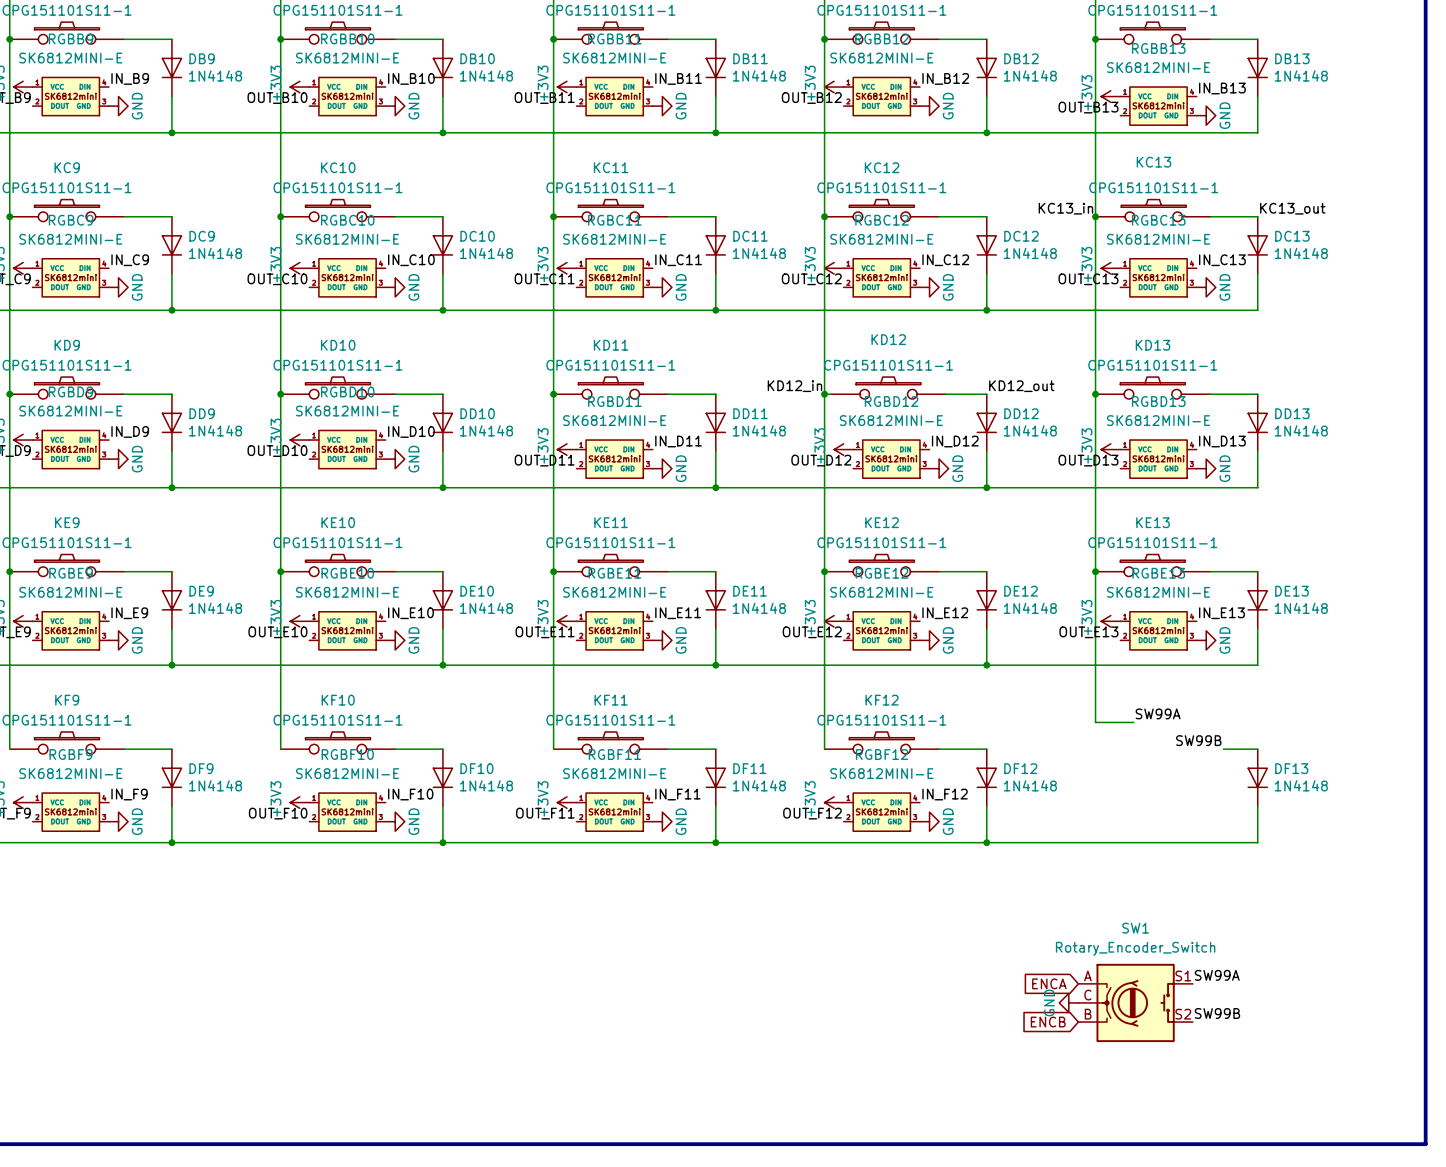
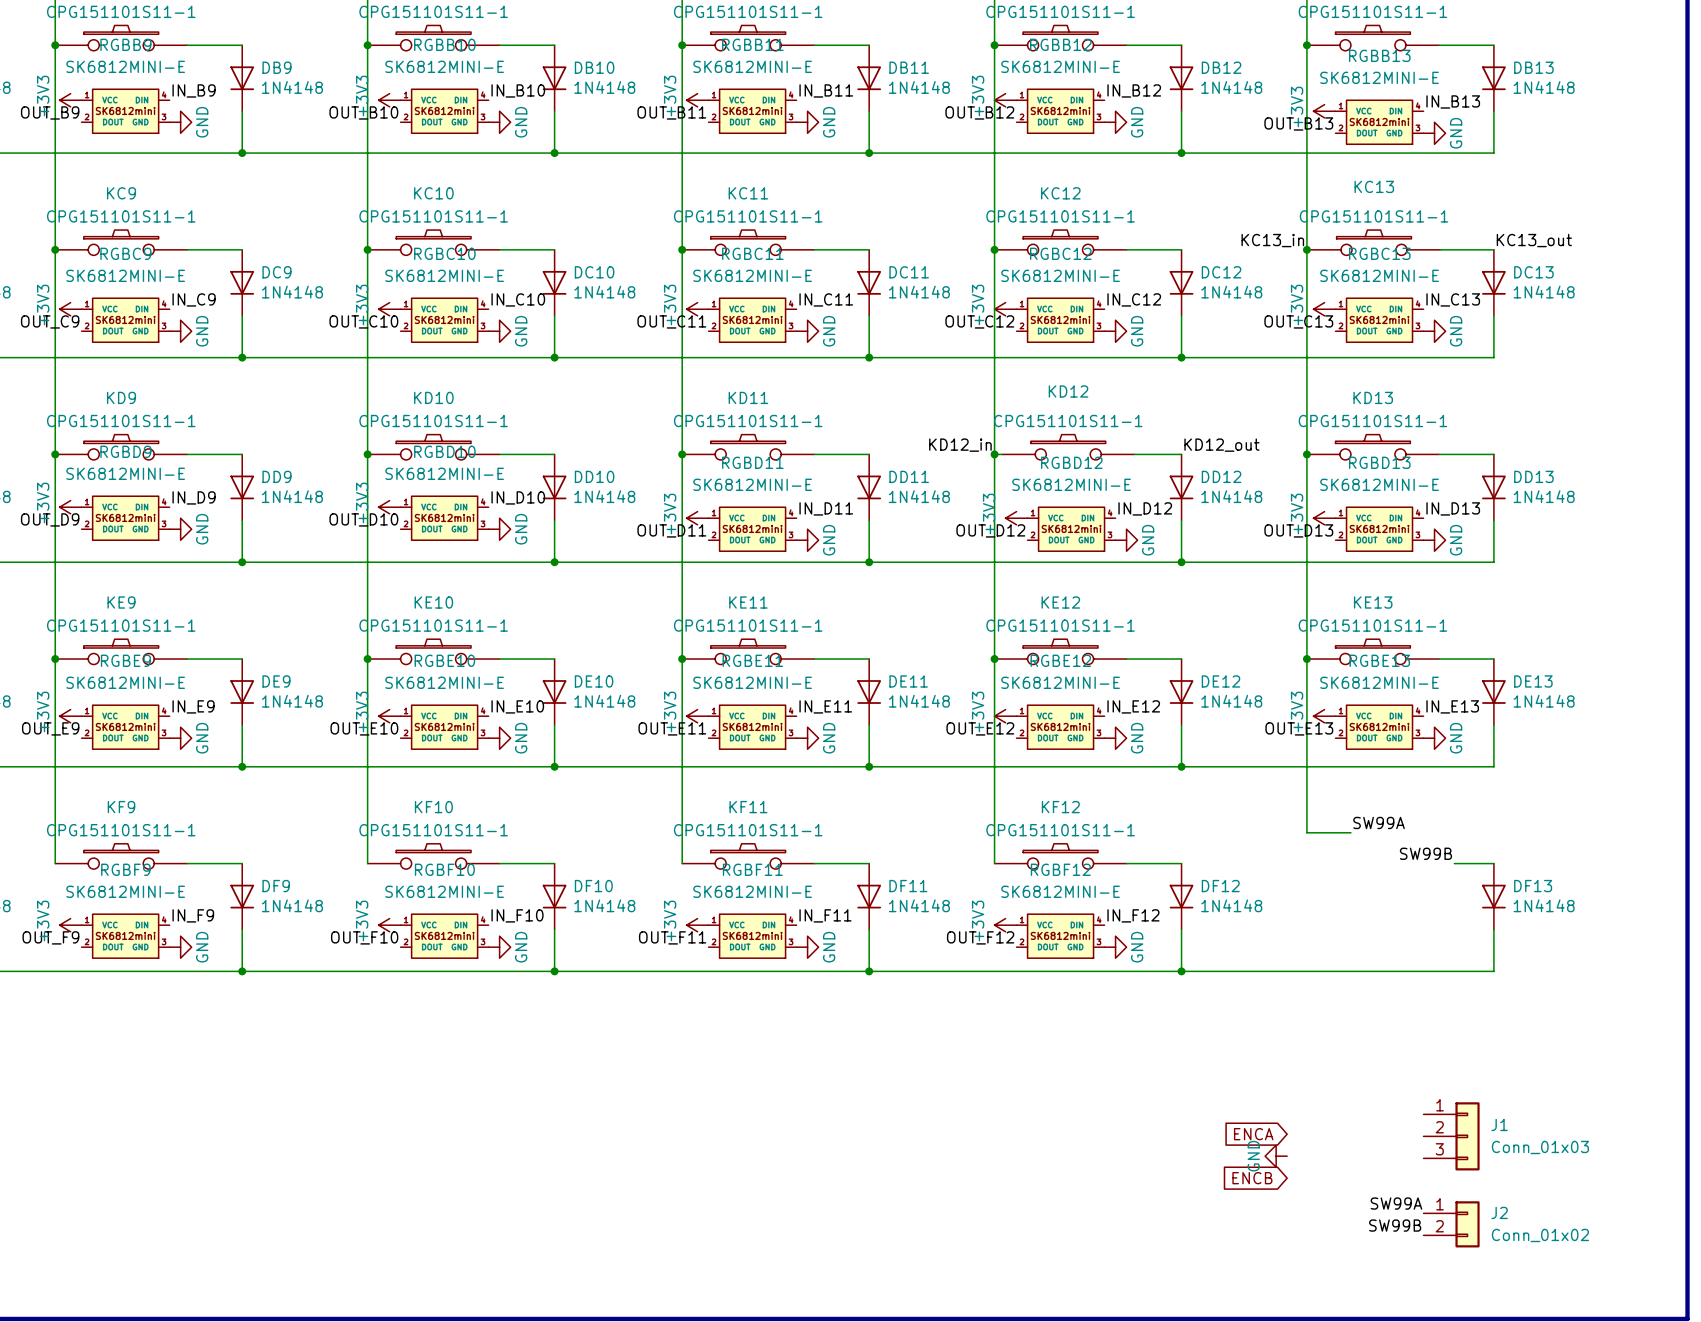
label position: SW99A (1217, 975) -> SW99A (1396, 1203)
J1: none -> Conn_01x03 (1451, 1136)
SW1: Rotary_Encoder_Switch (1135, 1002) -> none
label position: SW99B (1217, 1013) -> SW99B (1395, 1225)
J2: none -> Conn_01x02 (1451, 1224)

